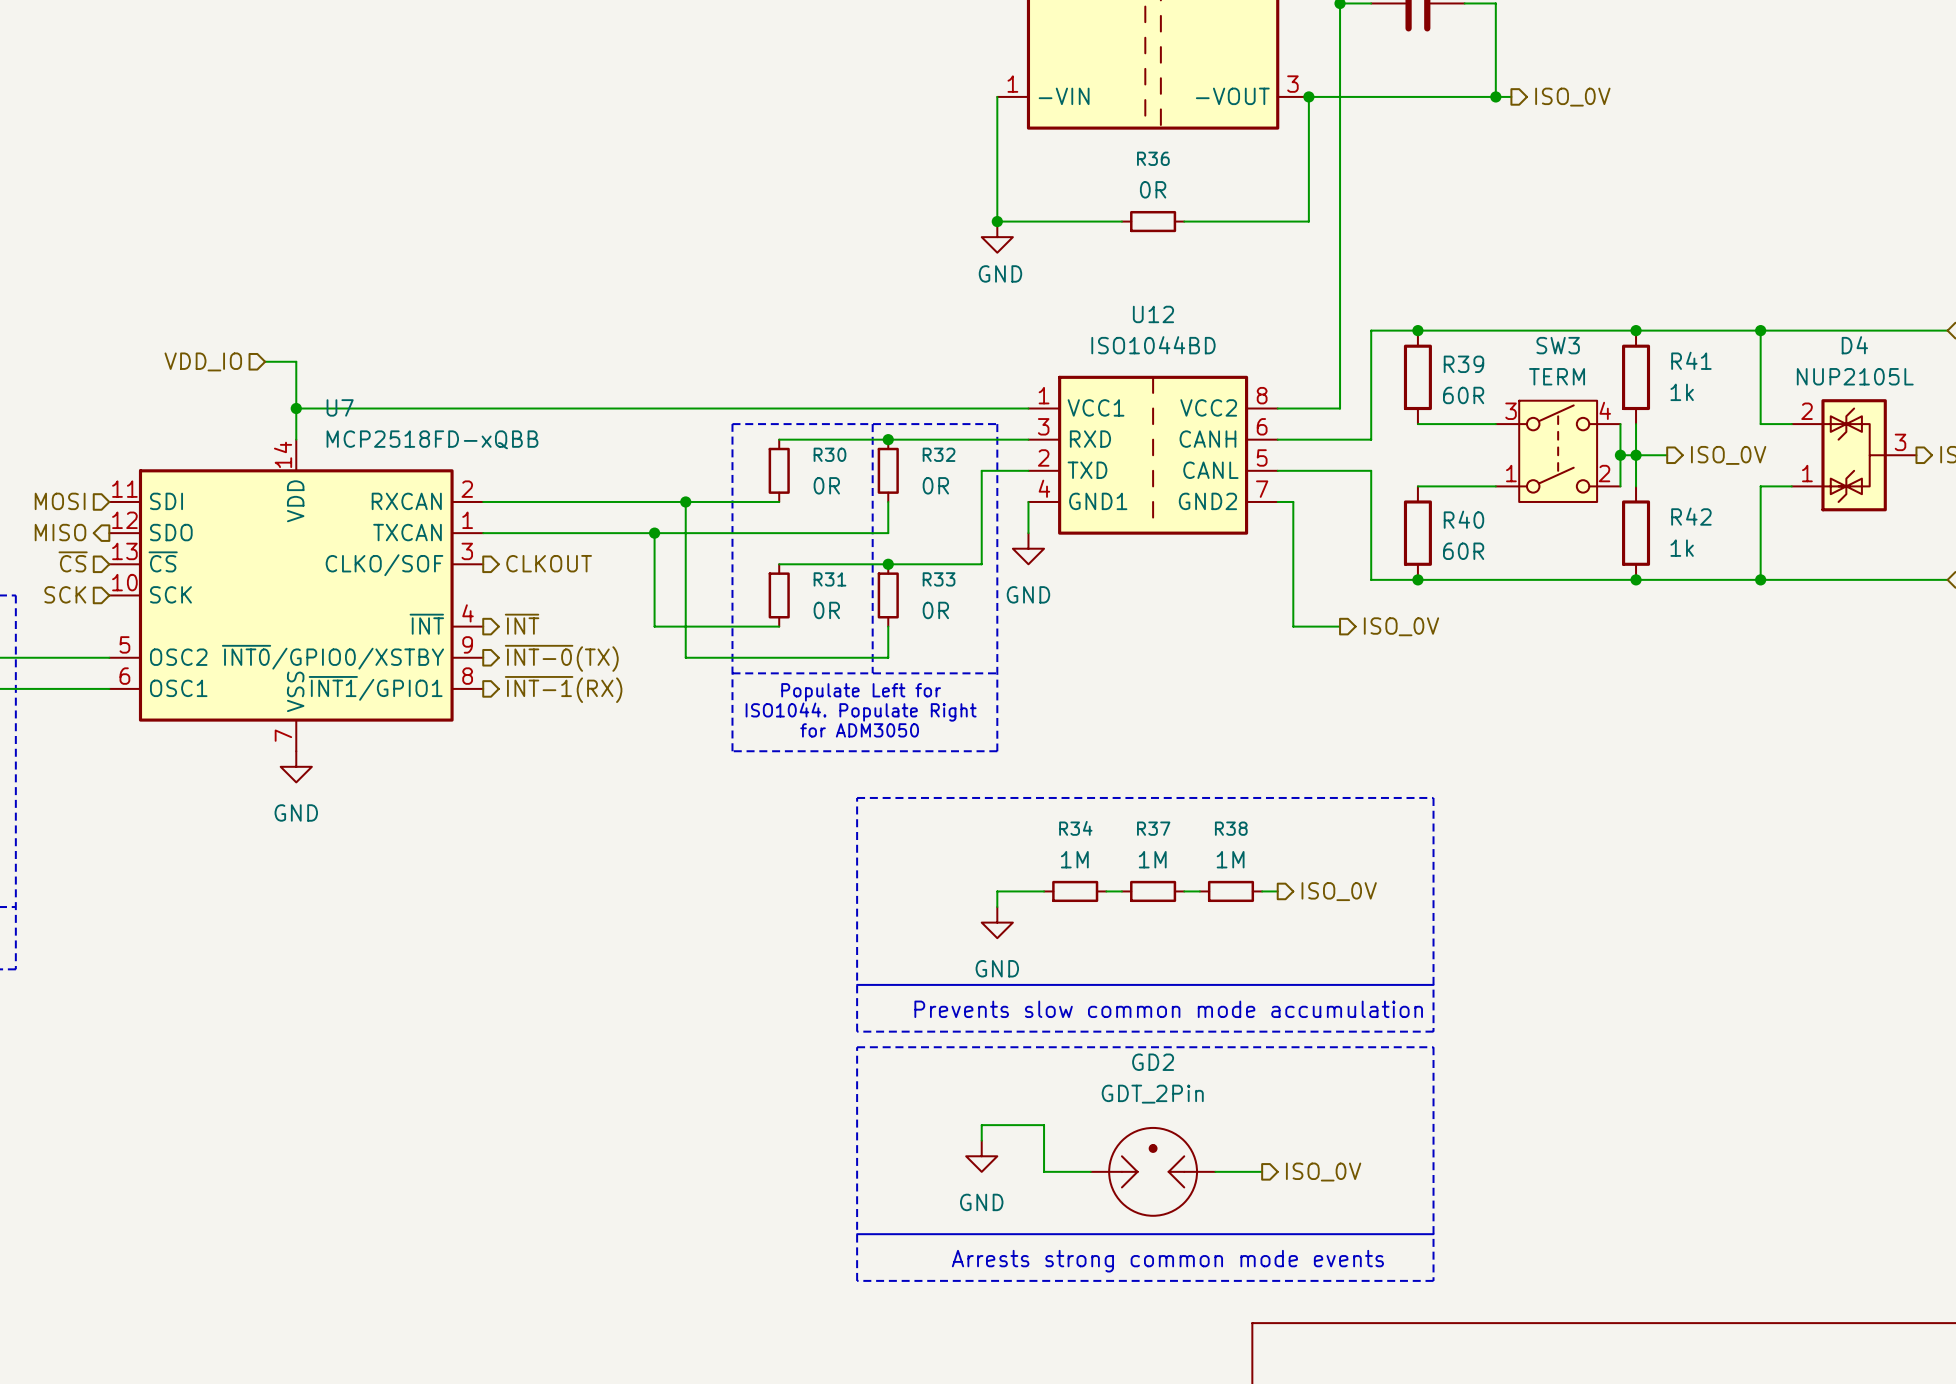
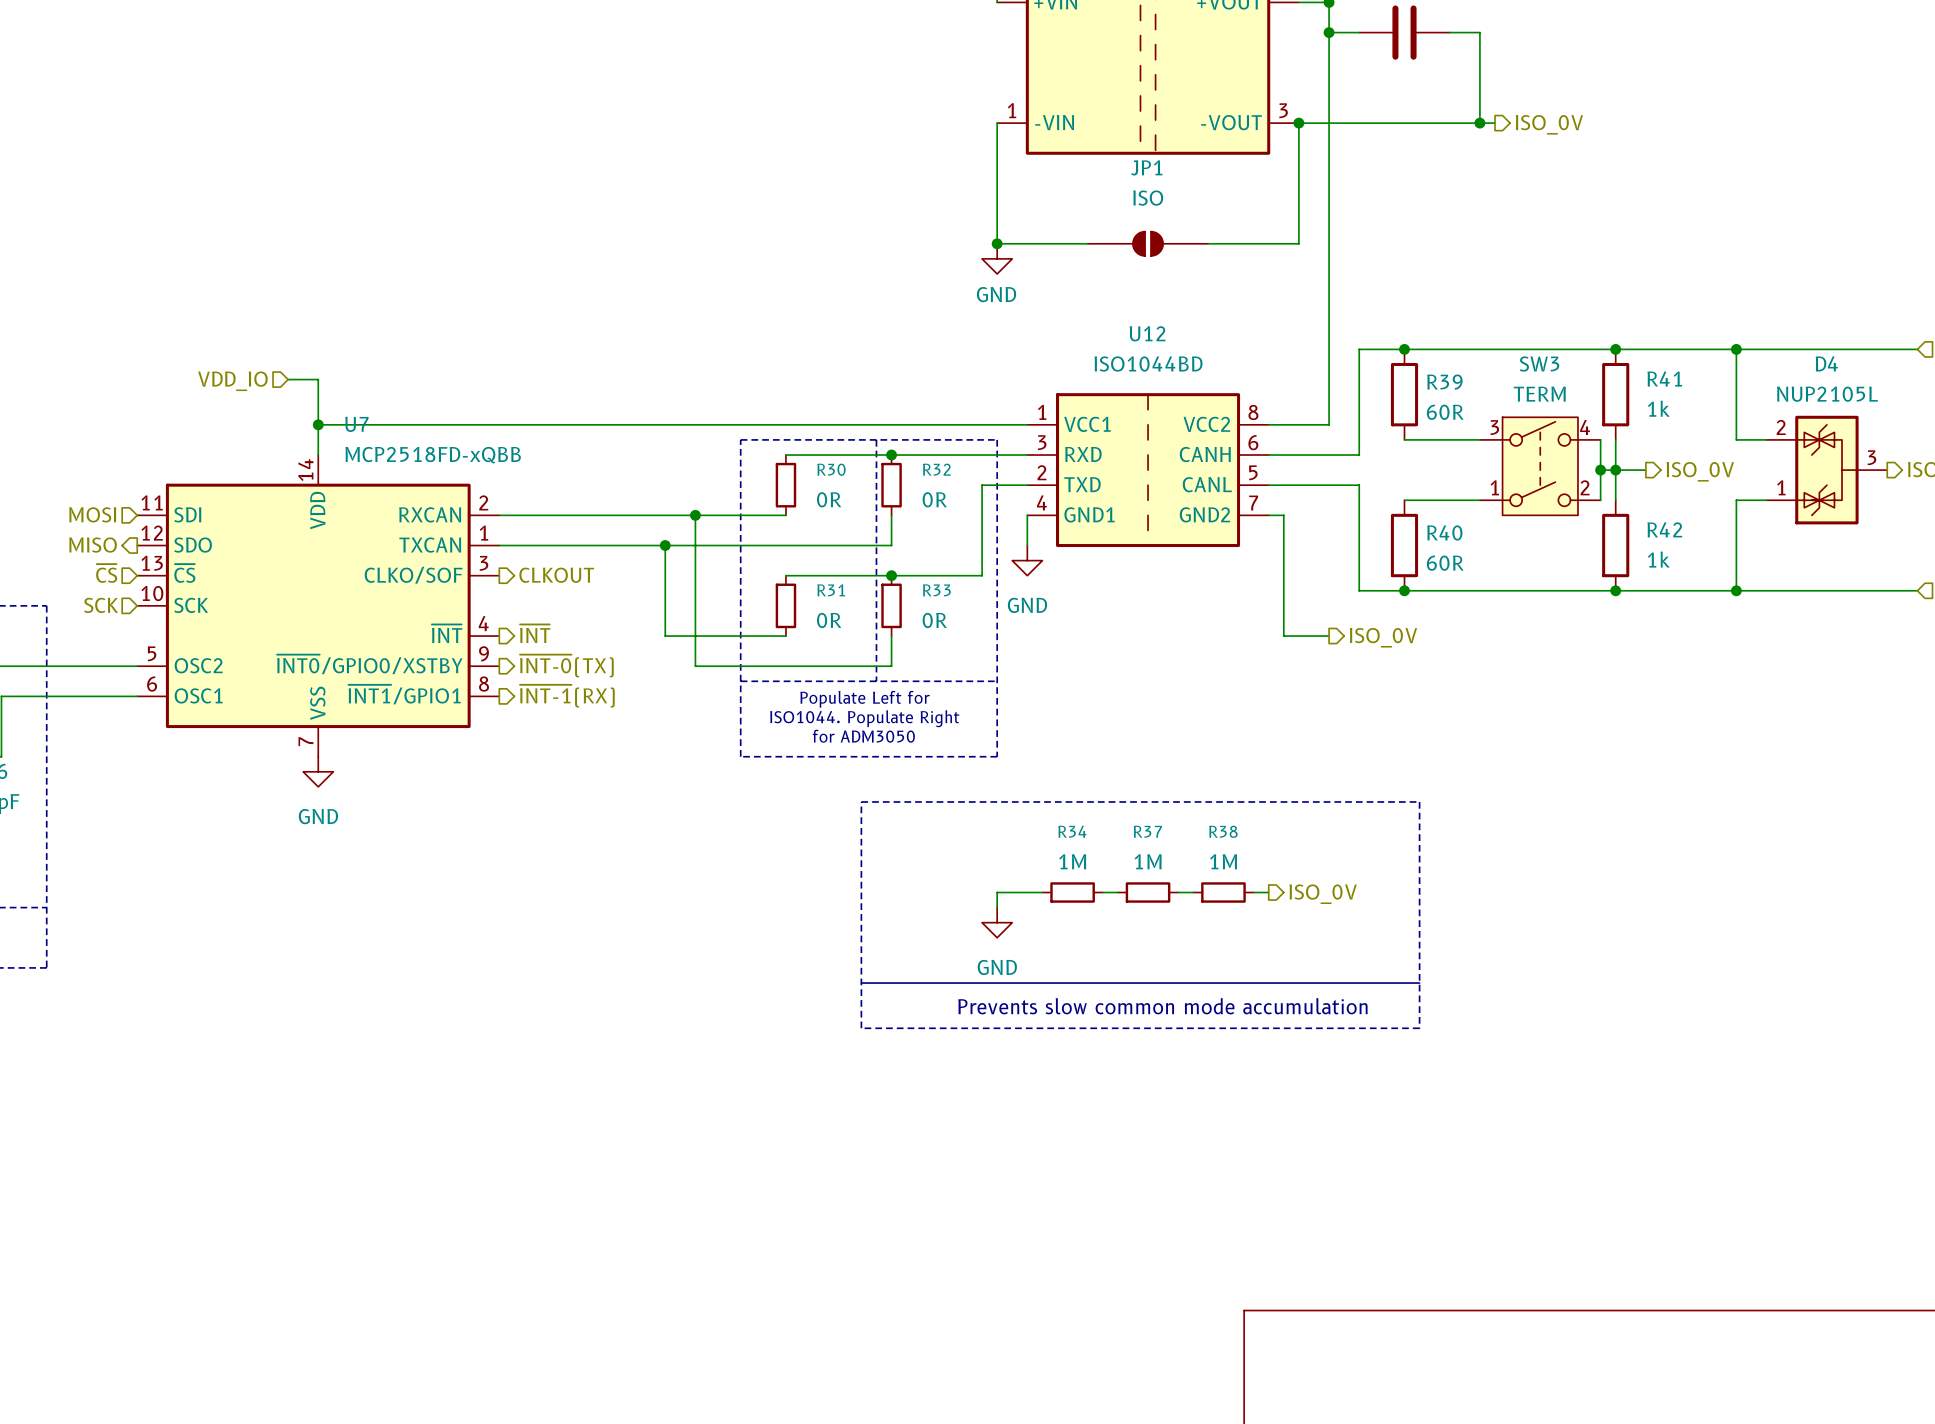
R36: 0R (1153, 221) -> none
JP1: none -> ISO (1148, 243)
line: (857, 1047) (1433, 1047) (1433, 1280) (857, 1280) (857, 1047) -> none
wire: (981, 1140) (981, 1125) (1044, 1125) (1044, 1171) (1090, 1171) -> none
power symbol: GND (981, 1156) -> none
GD2: GDT_2Pin (1153, 1171) -> none
wire: (1215, 1171) (1262, 1171) -> none
hierarchical label: ISO_0V (1323, 1172) -> none
line: (857, 1234) (1433, 1234) -> none
text: Arrests strong common mode events (1167, 1261) -> none

